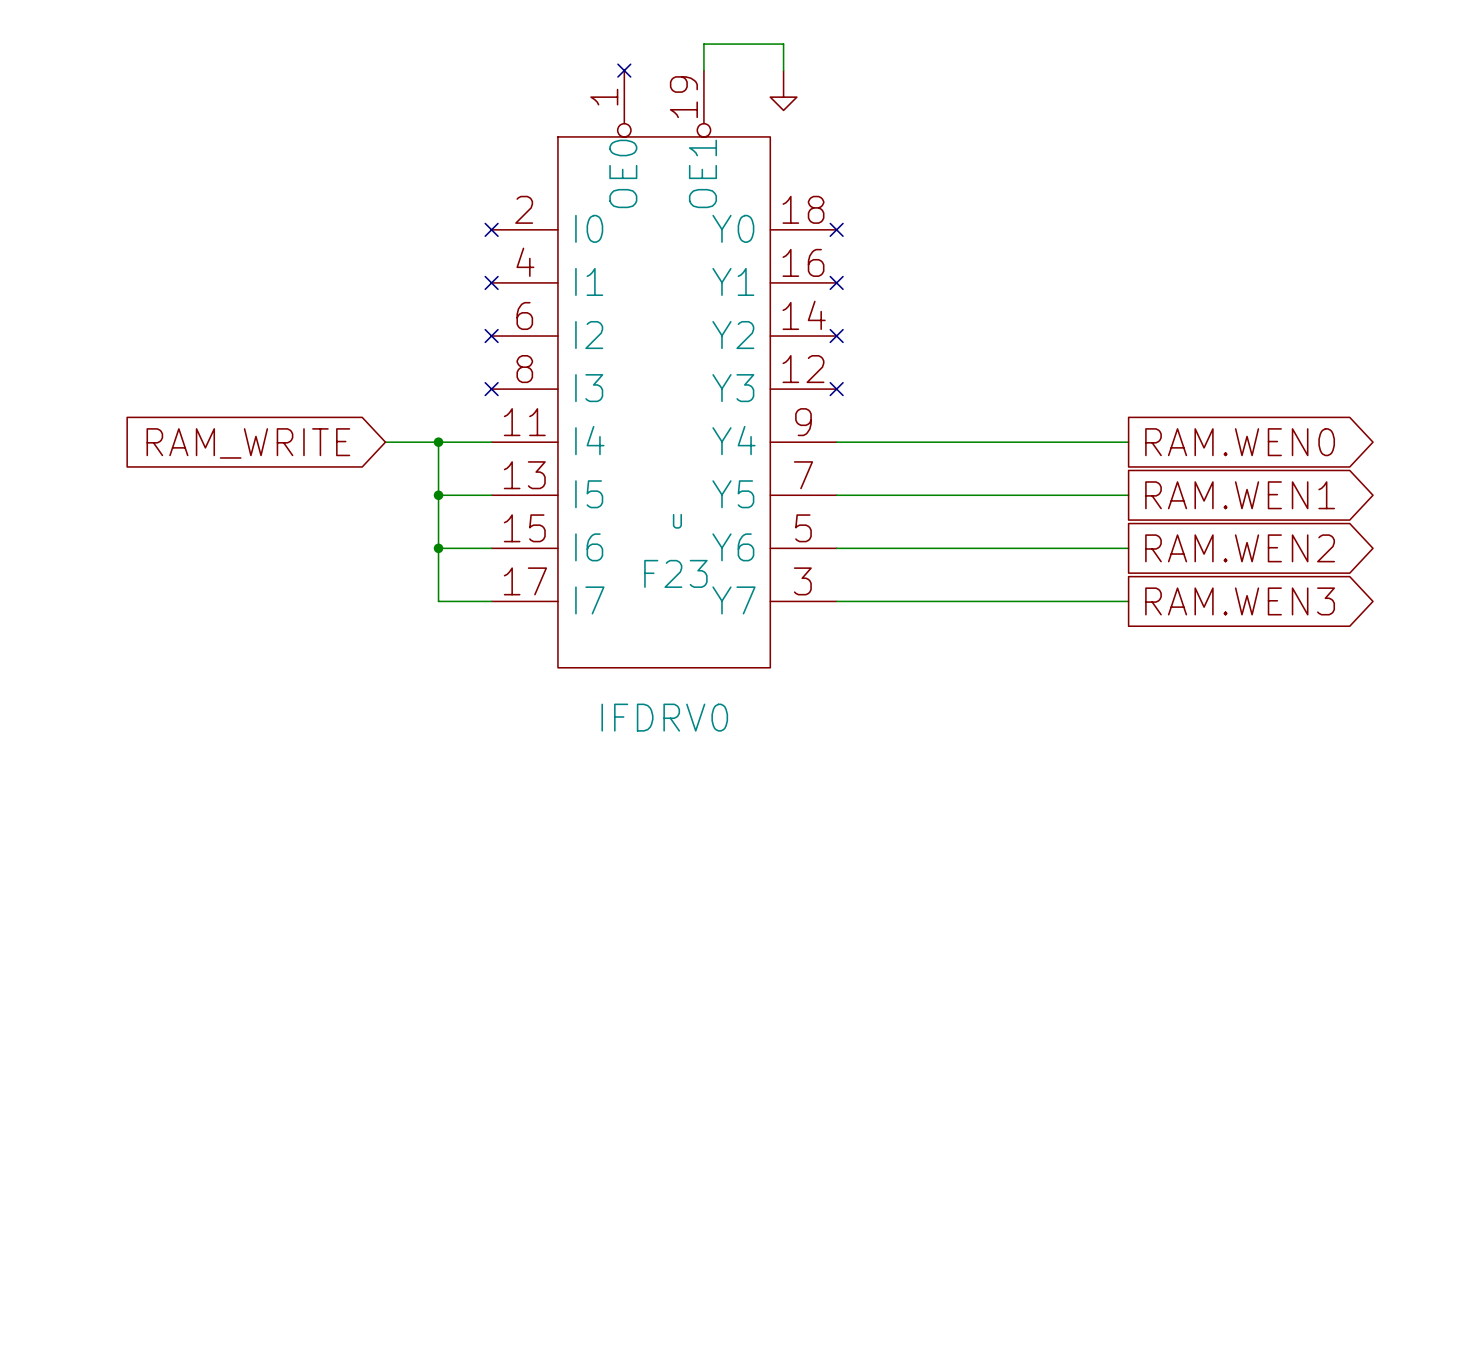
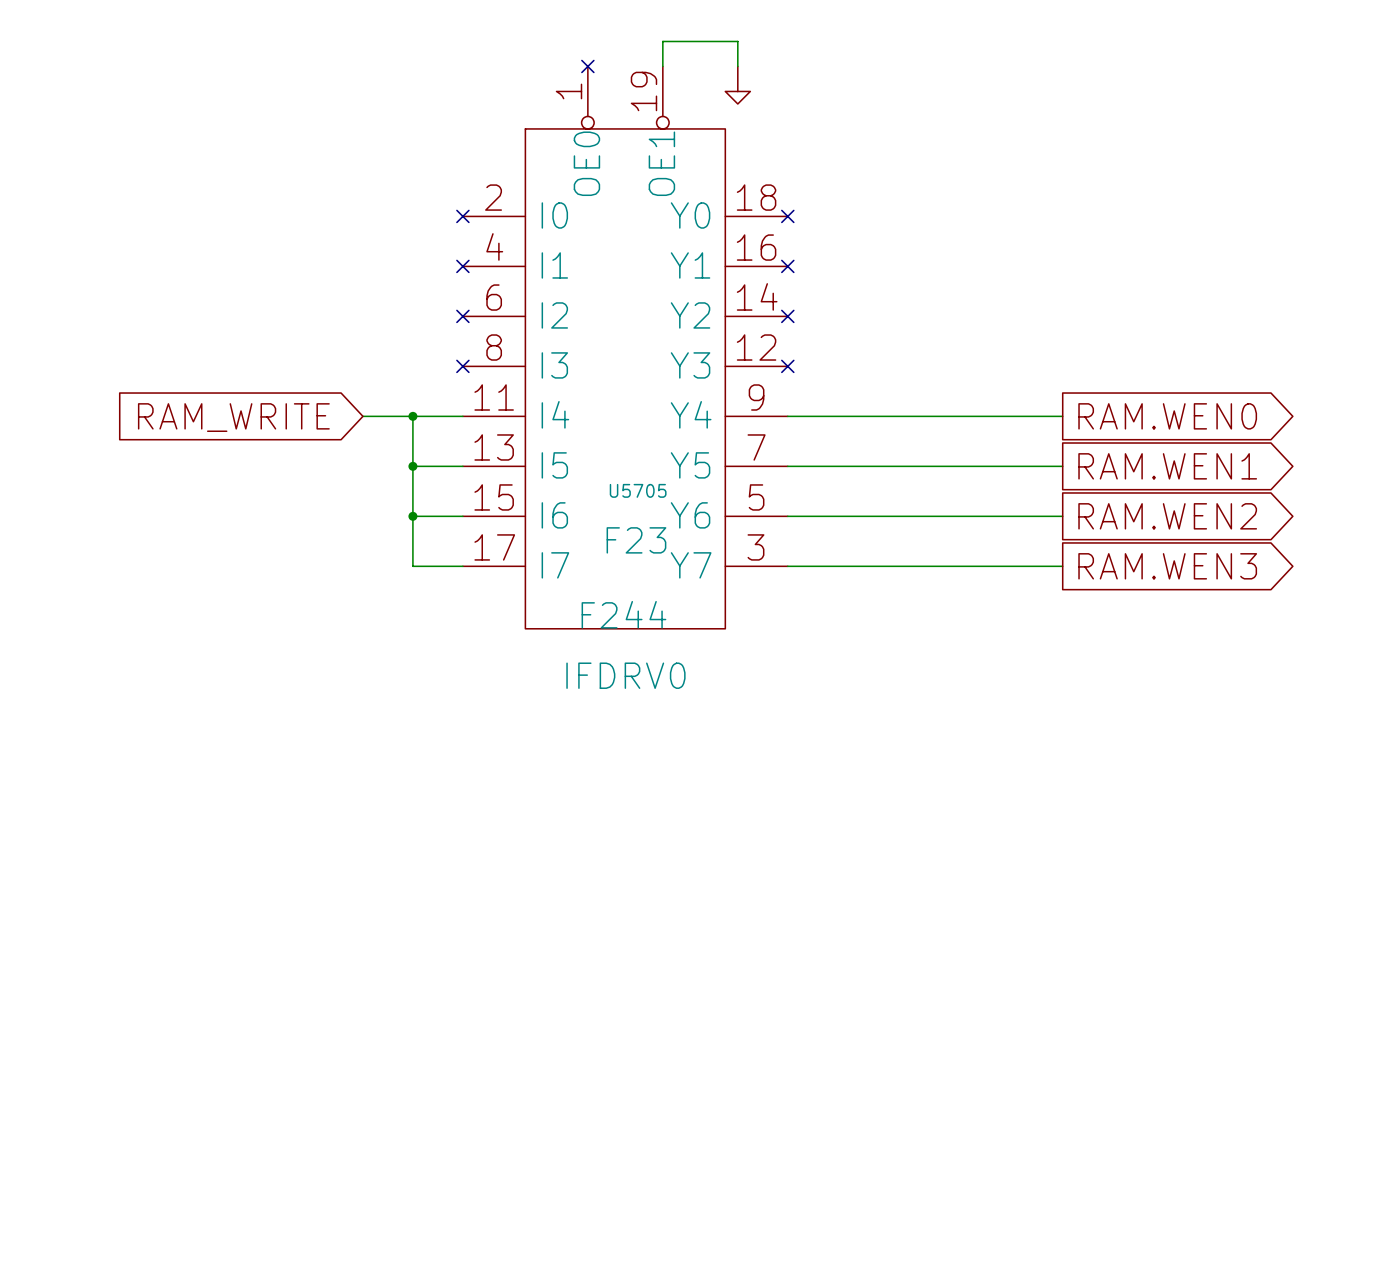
U name: U (677, 521) -> U5705 (638, 490)
U value: none -> F244 (623, 614)

